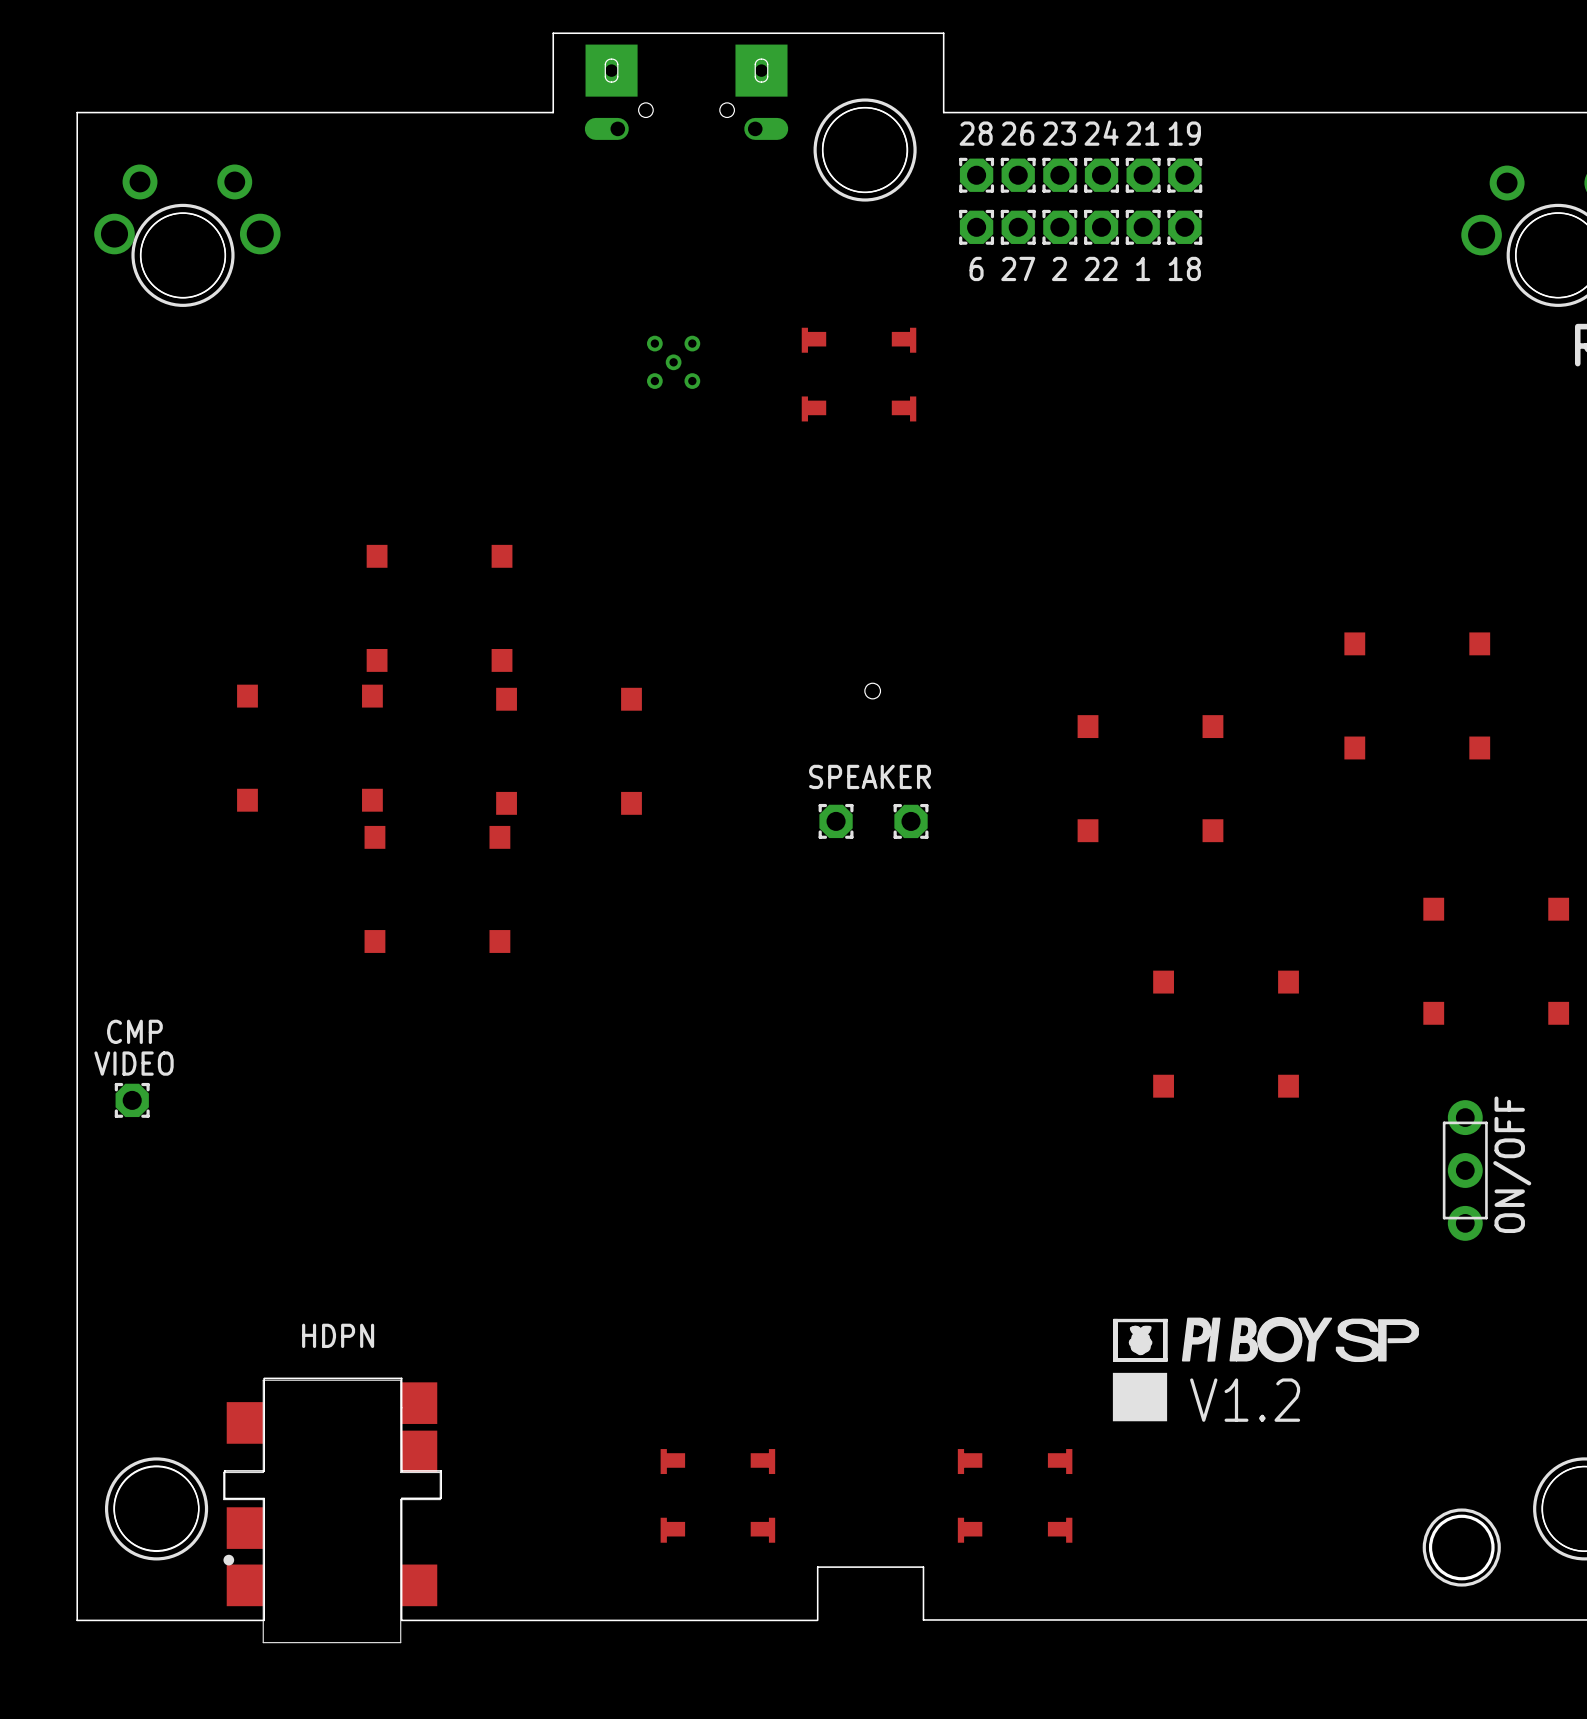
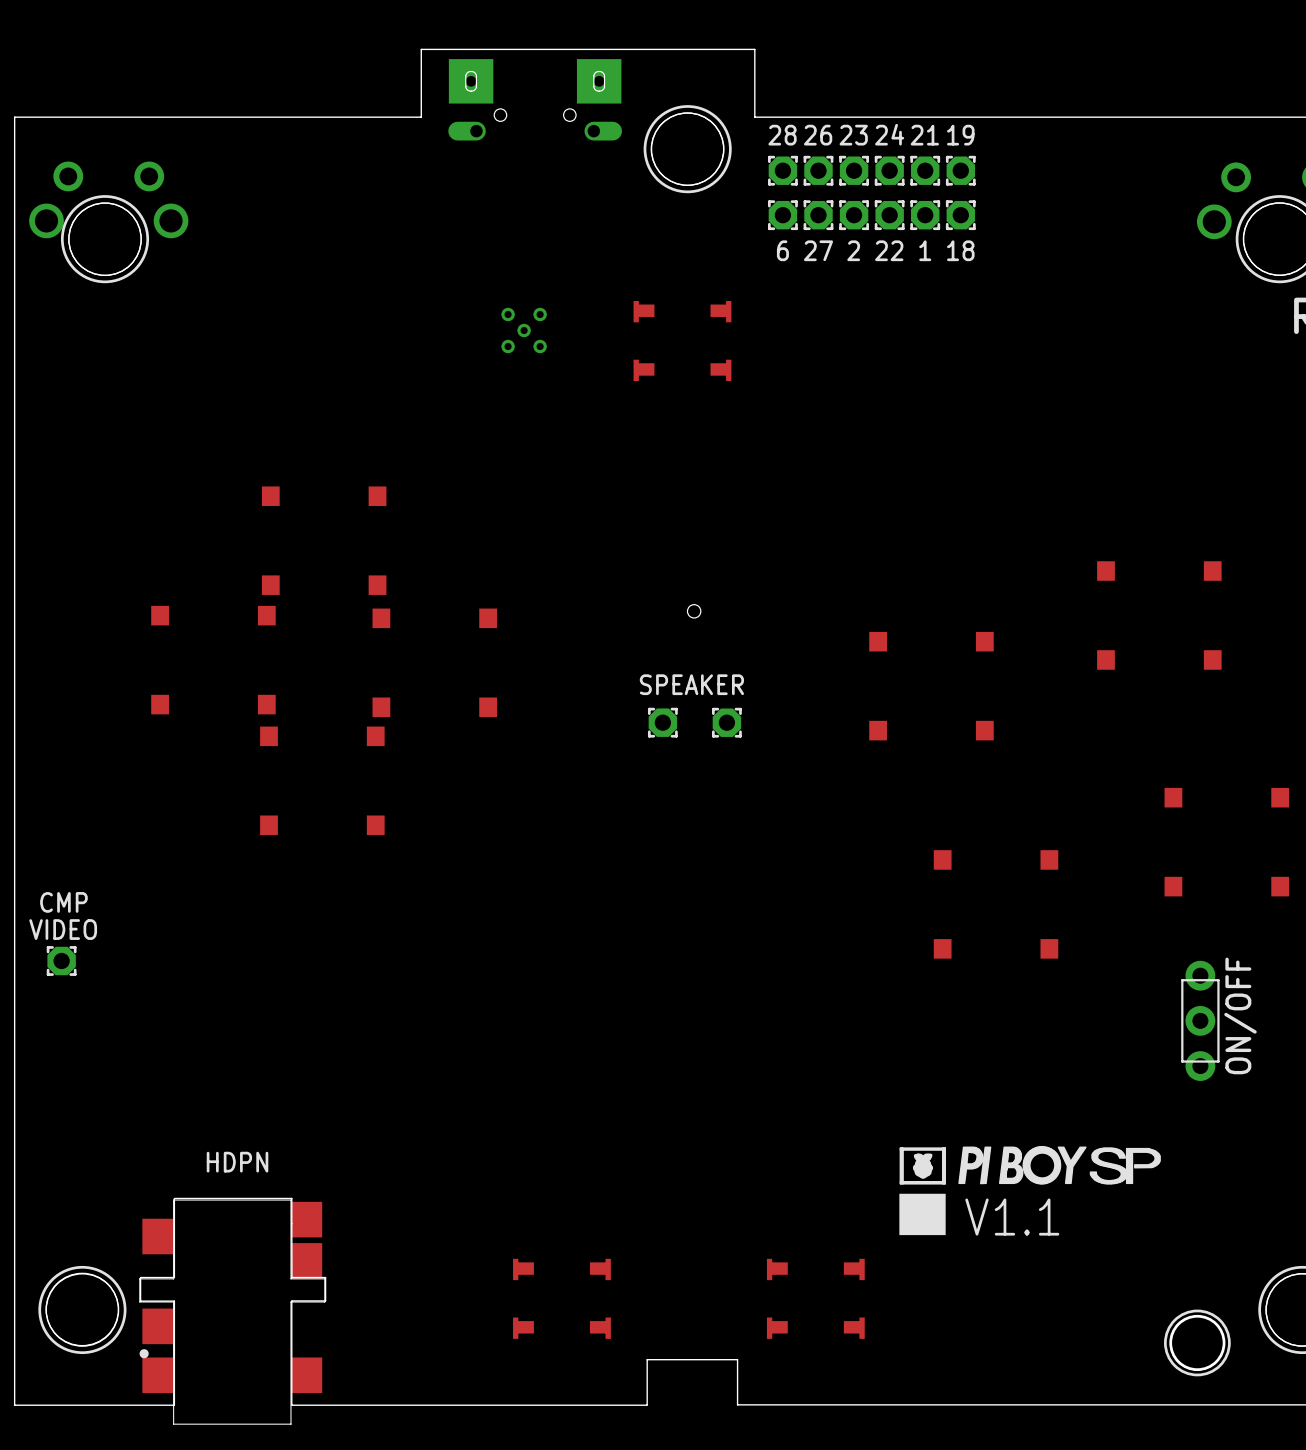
text: V1.2 (1245, 1400) -> V1.1 (1012, 1217)

